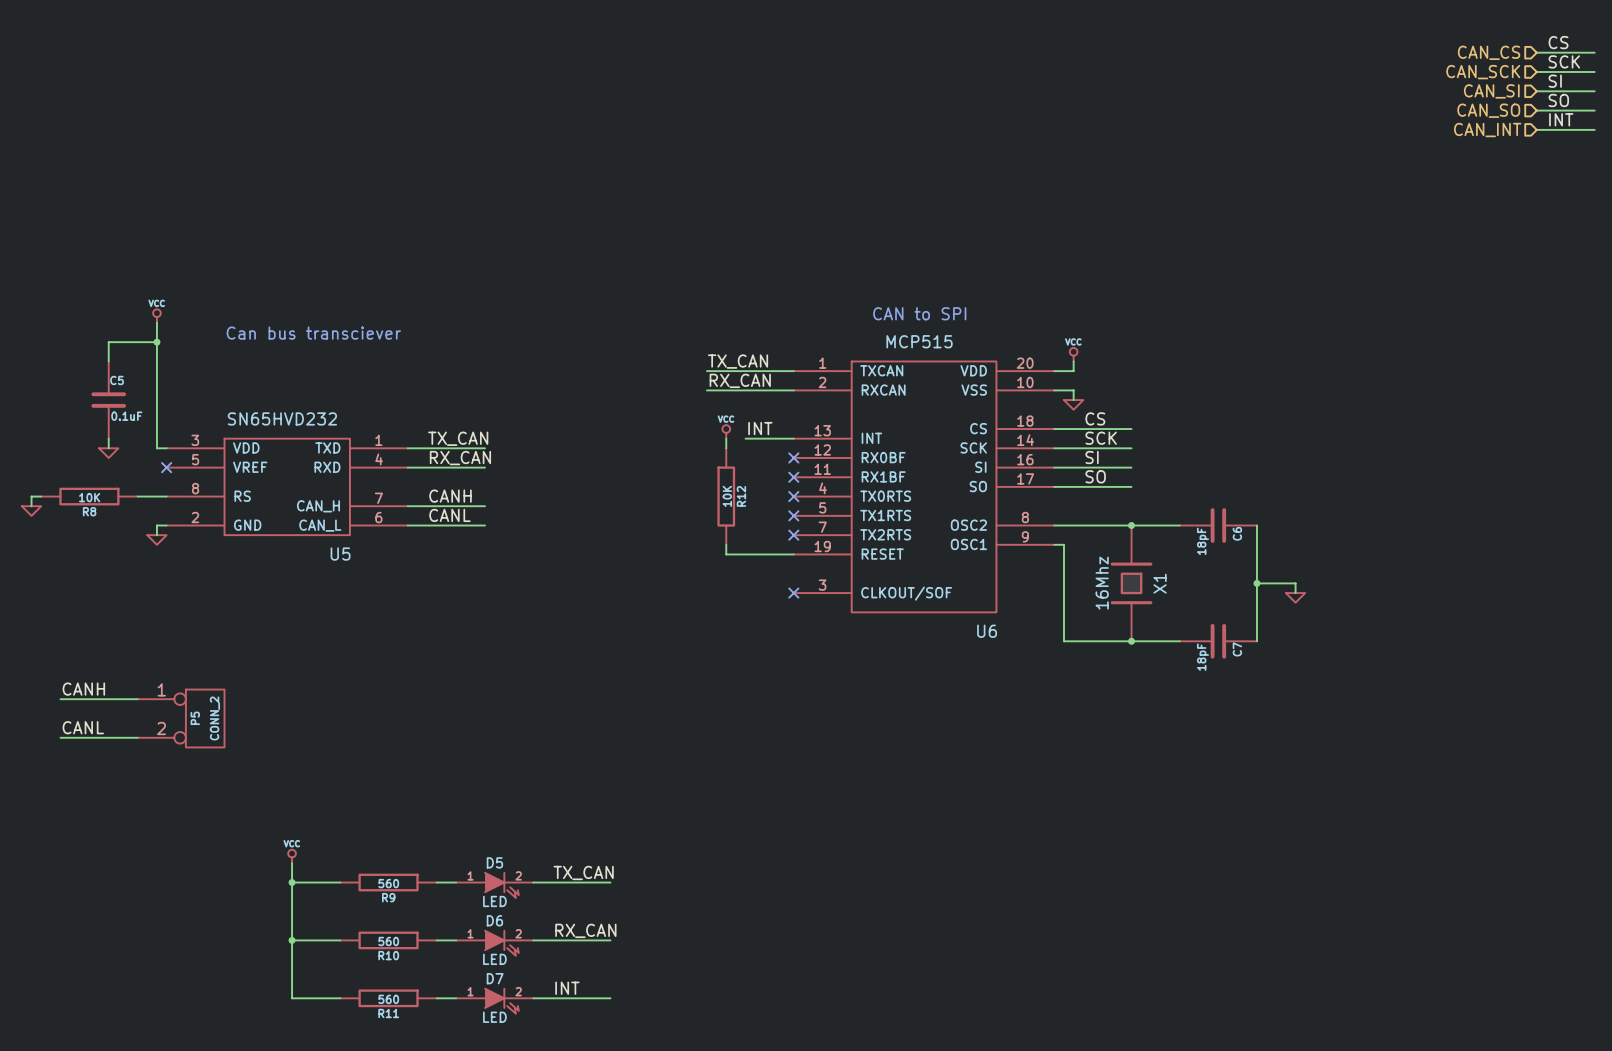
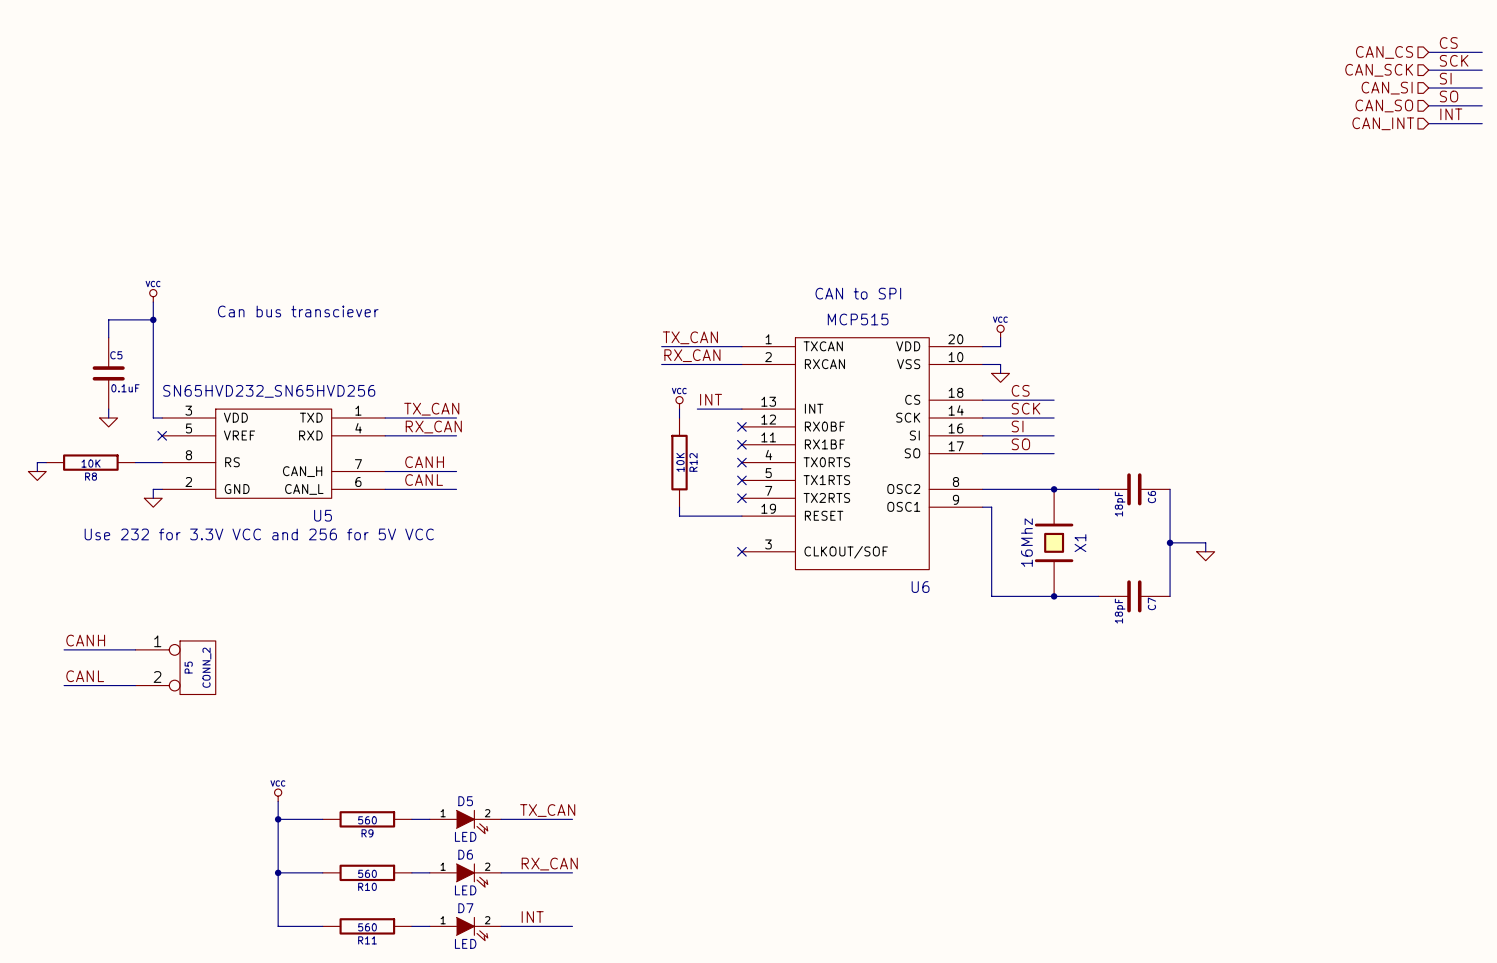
U5 value: SN65HVD232 (282, 418) -> SN65HVD232_SN65HVD256 (269, 391)
text: none -> Use 232 for 3.3V VCC and 256 for 5V VCC (259, 534)

